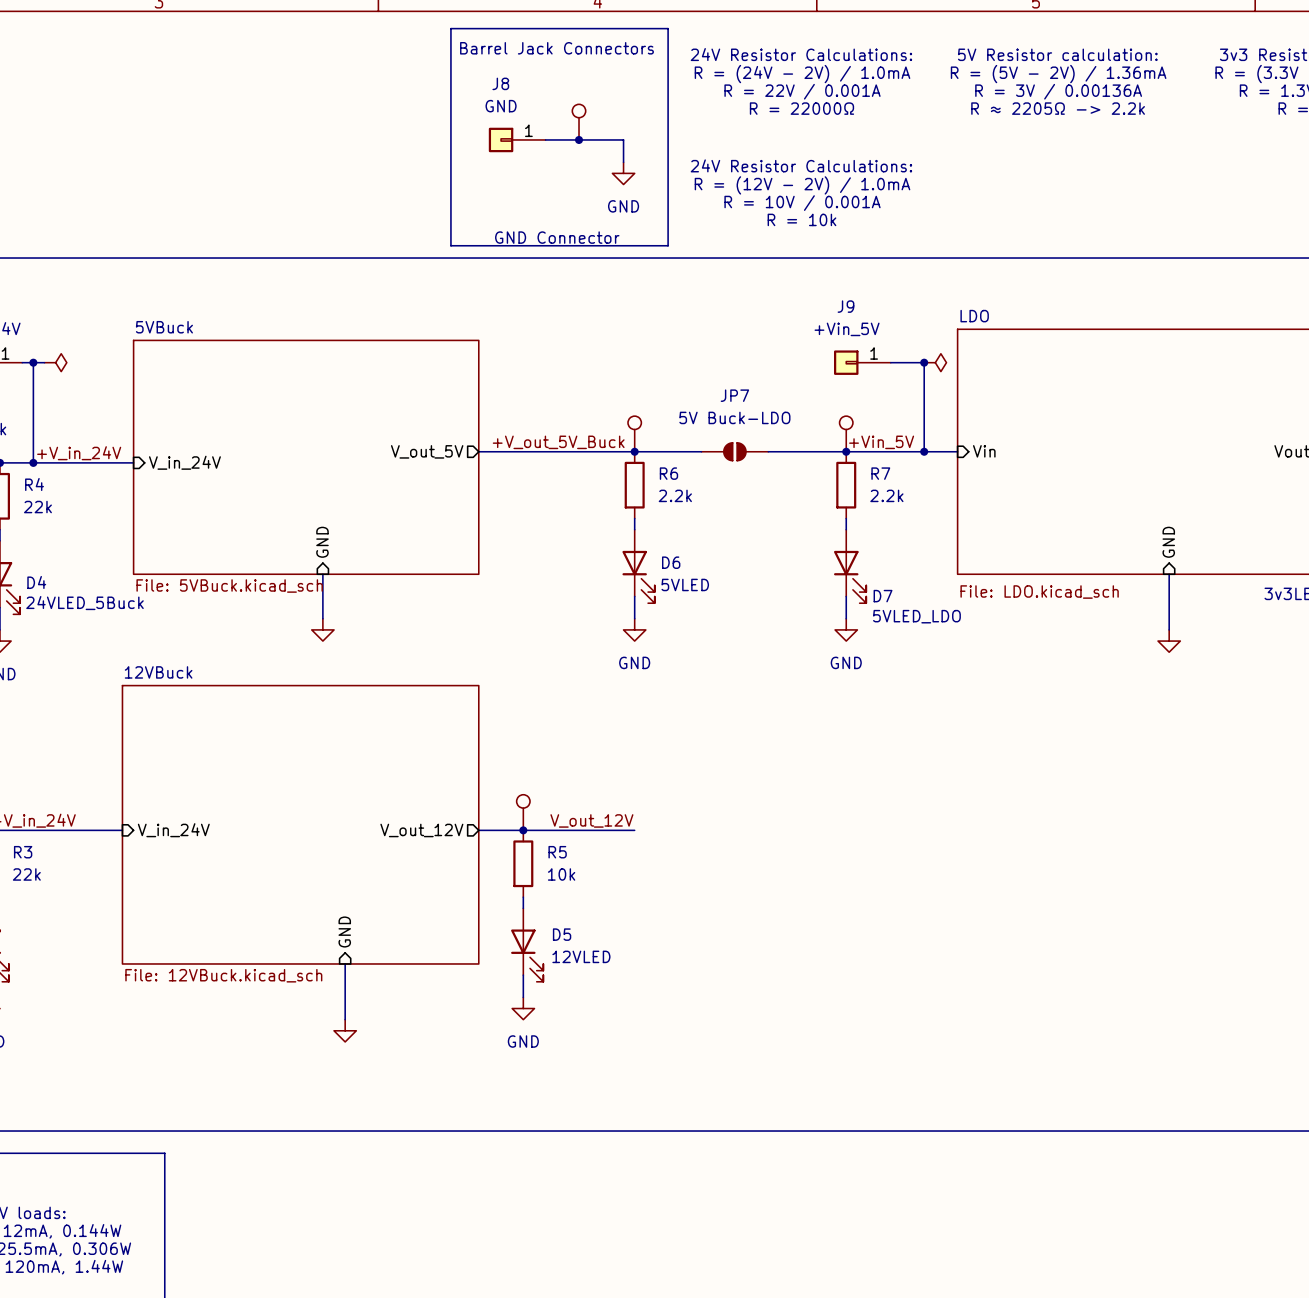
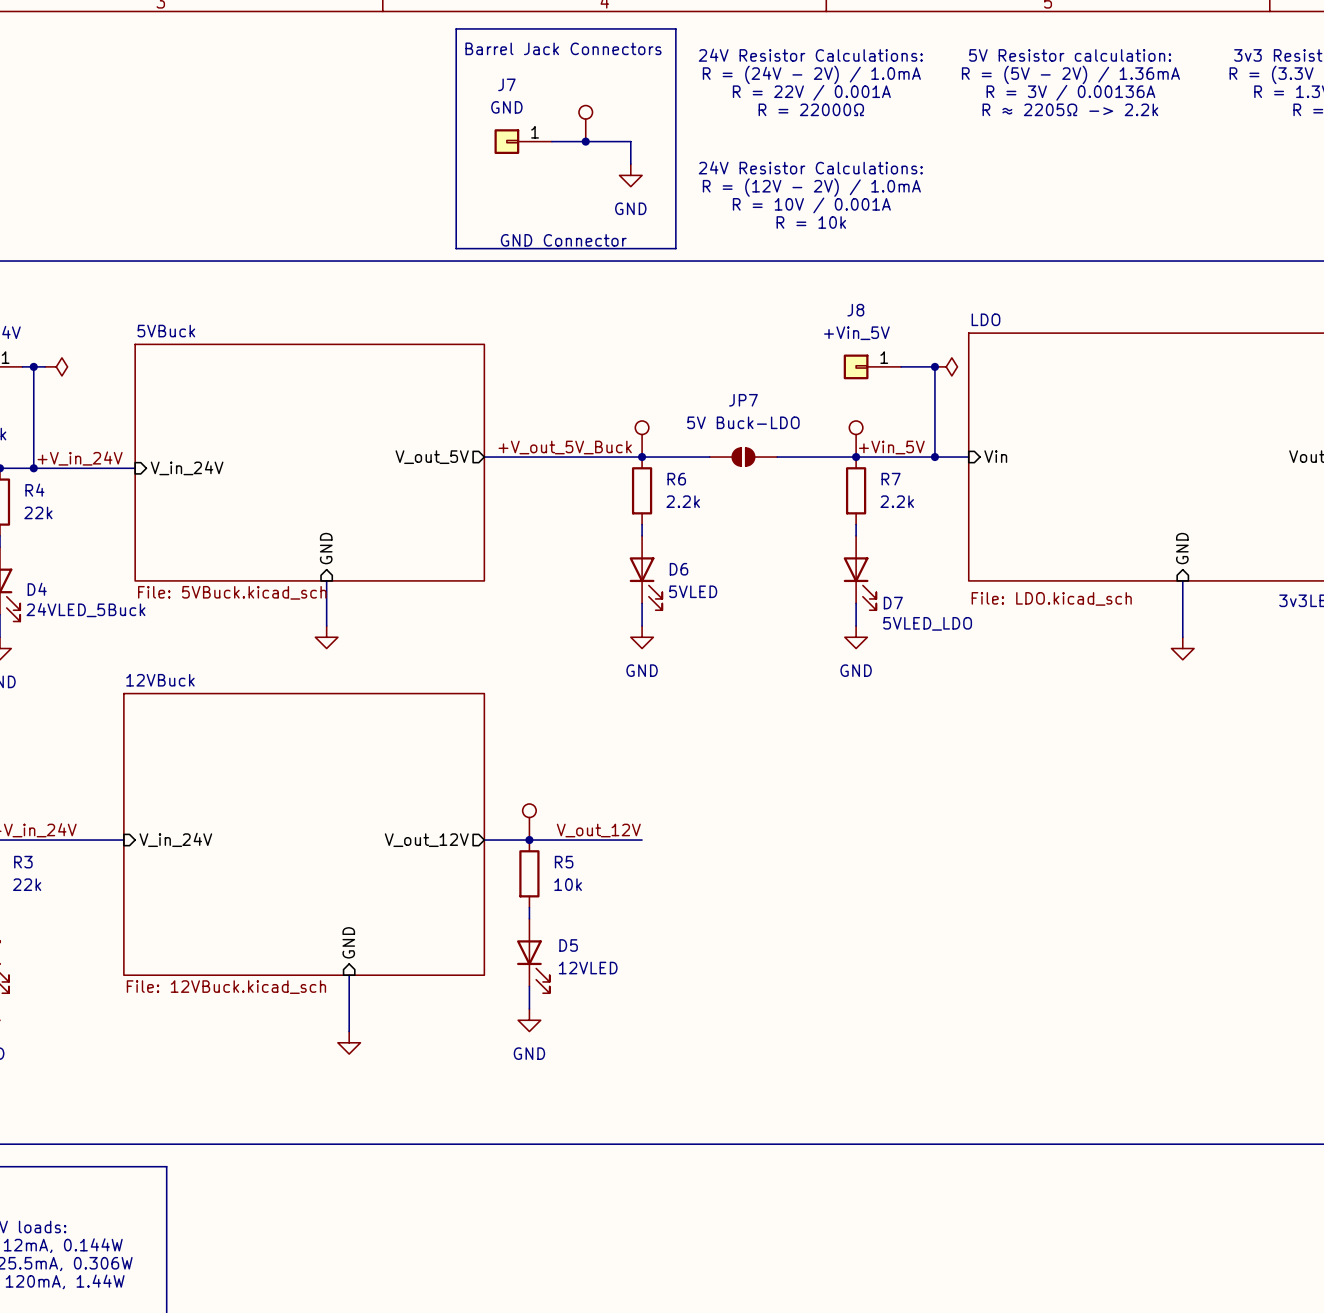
J8 name: J8 (500, 83) -> J7 (506, 84)
J9 name: J9 (845, 306) -> J8 (855, 310)

